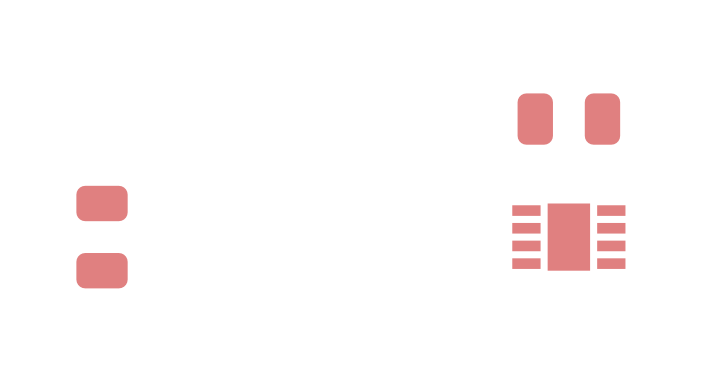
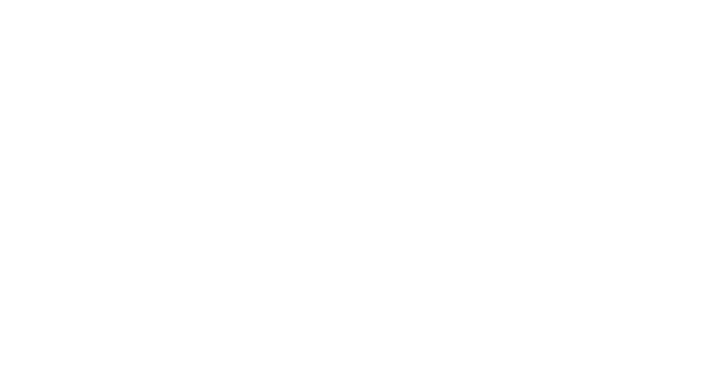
part: (568, 119) -> none
part: (102, 237) -> none
part: (568, 237) -> none

